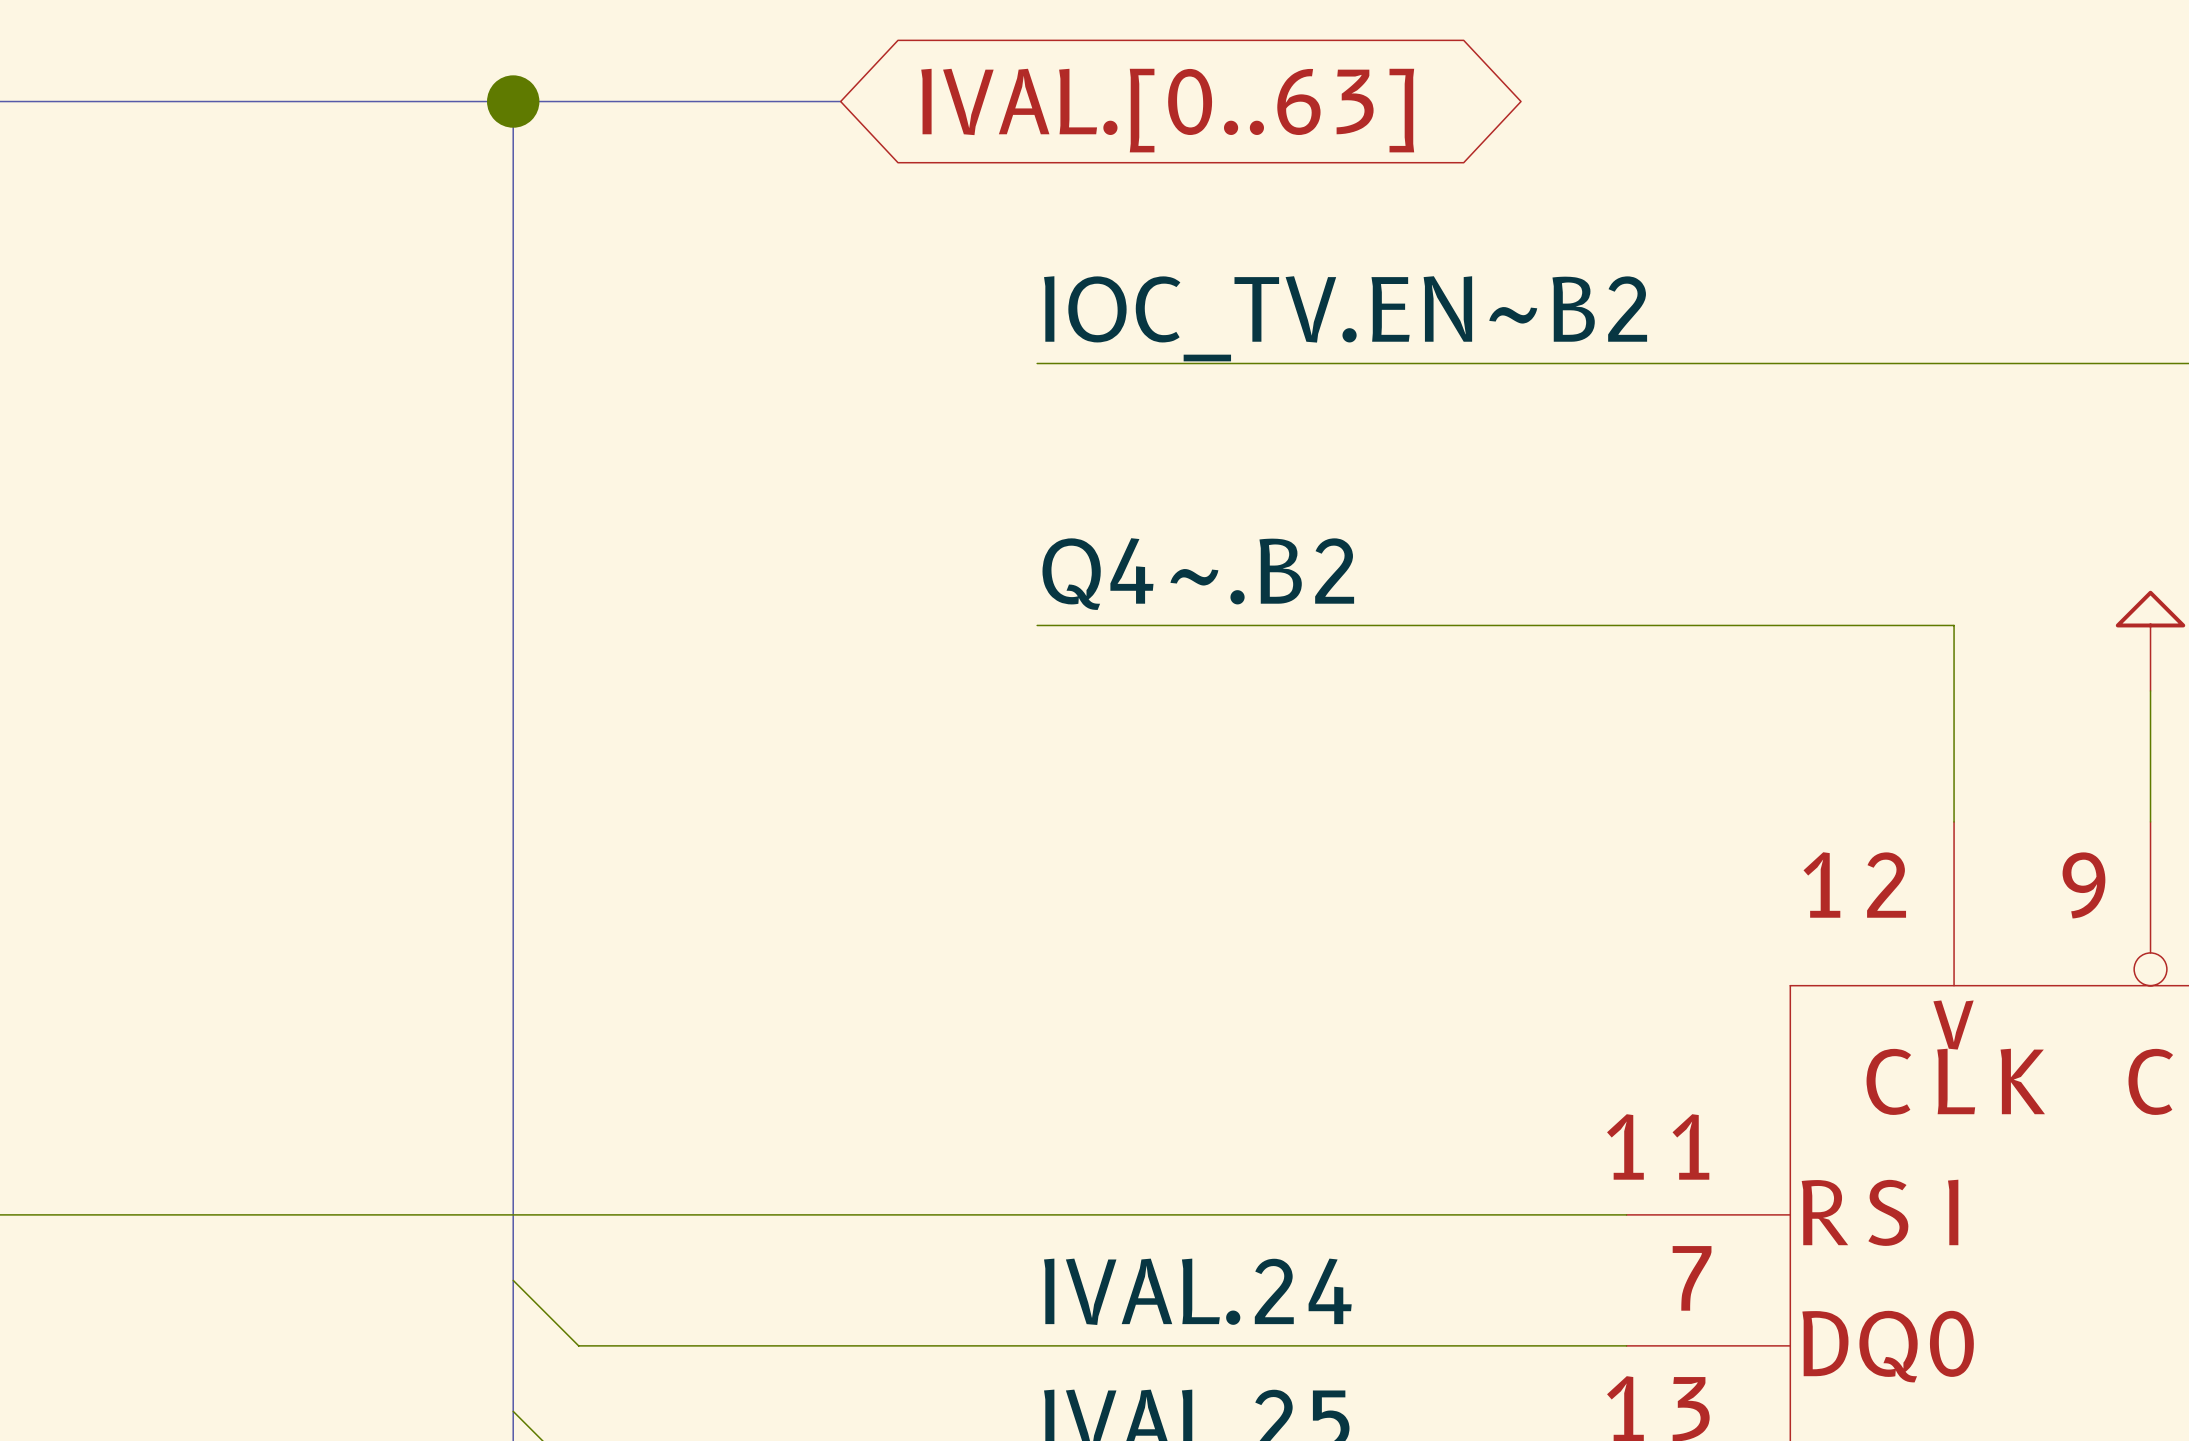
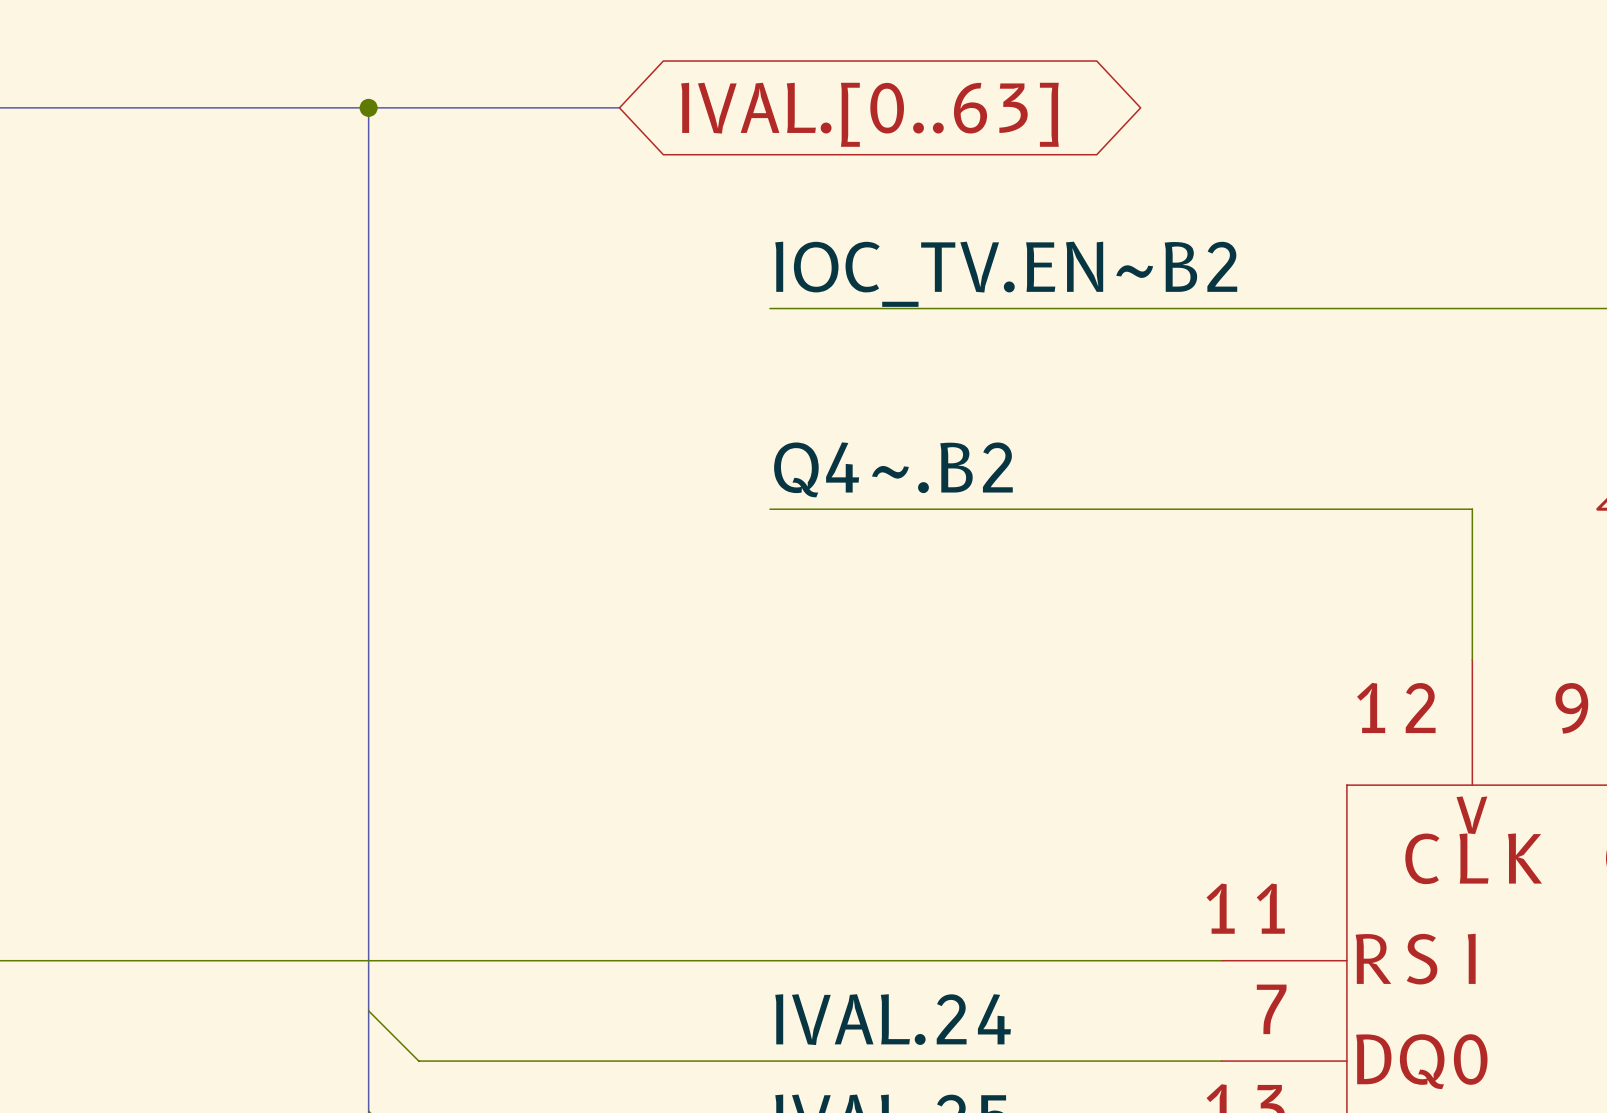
junction size: [487, 75, 540, 128] -> [359, 98, 378, 117]

